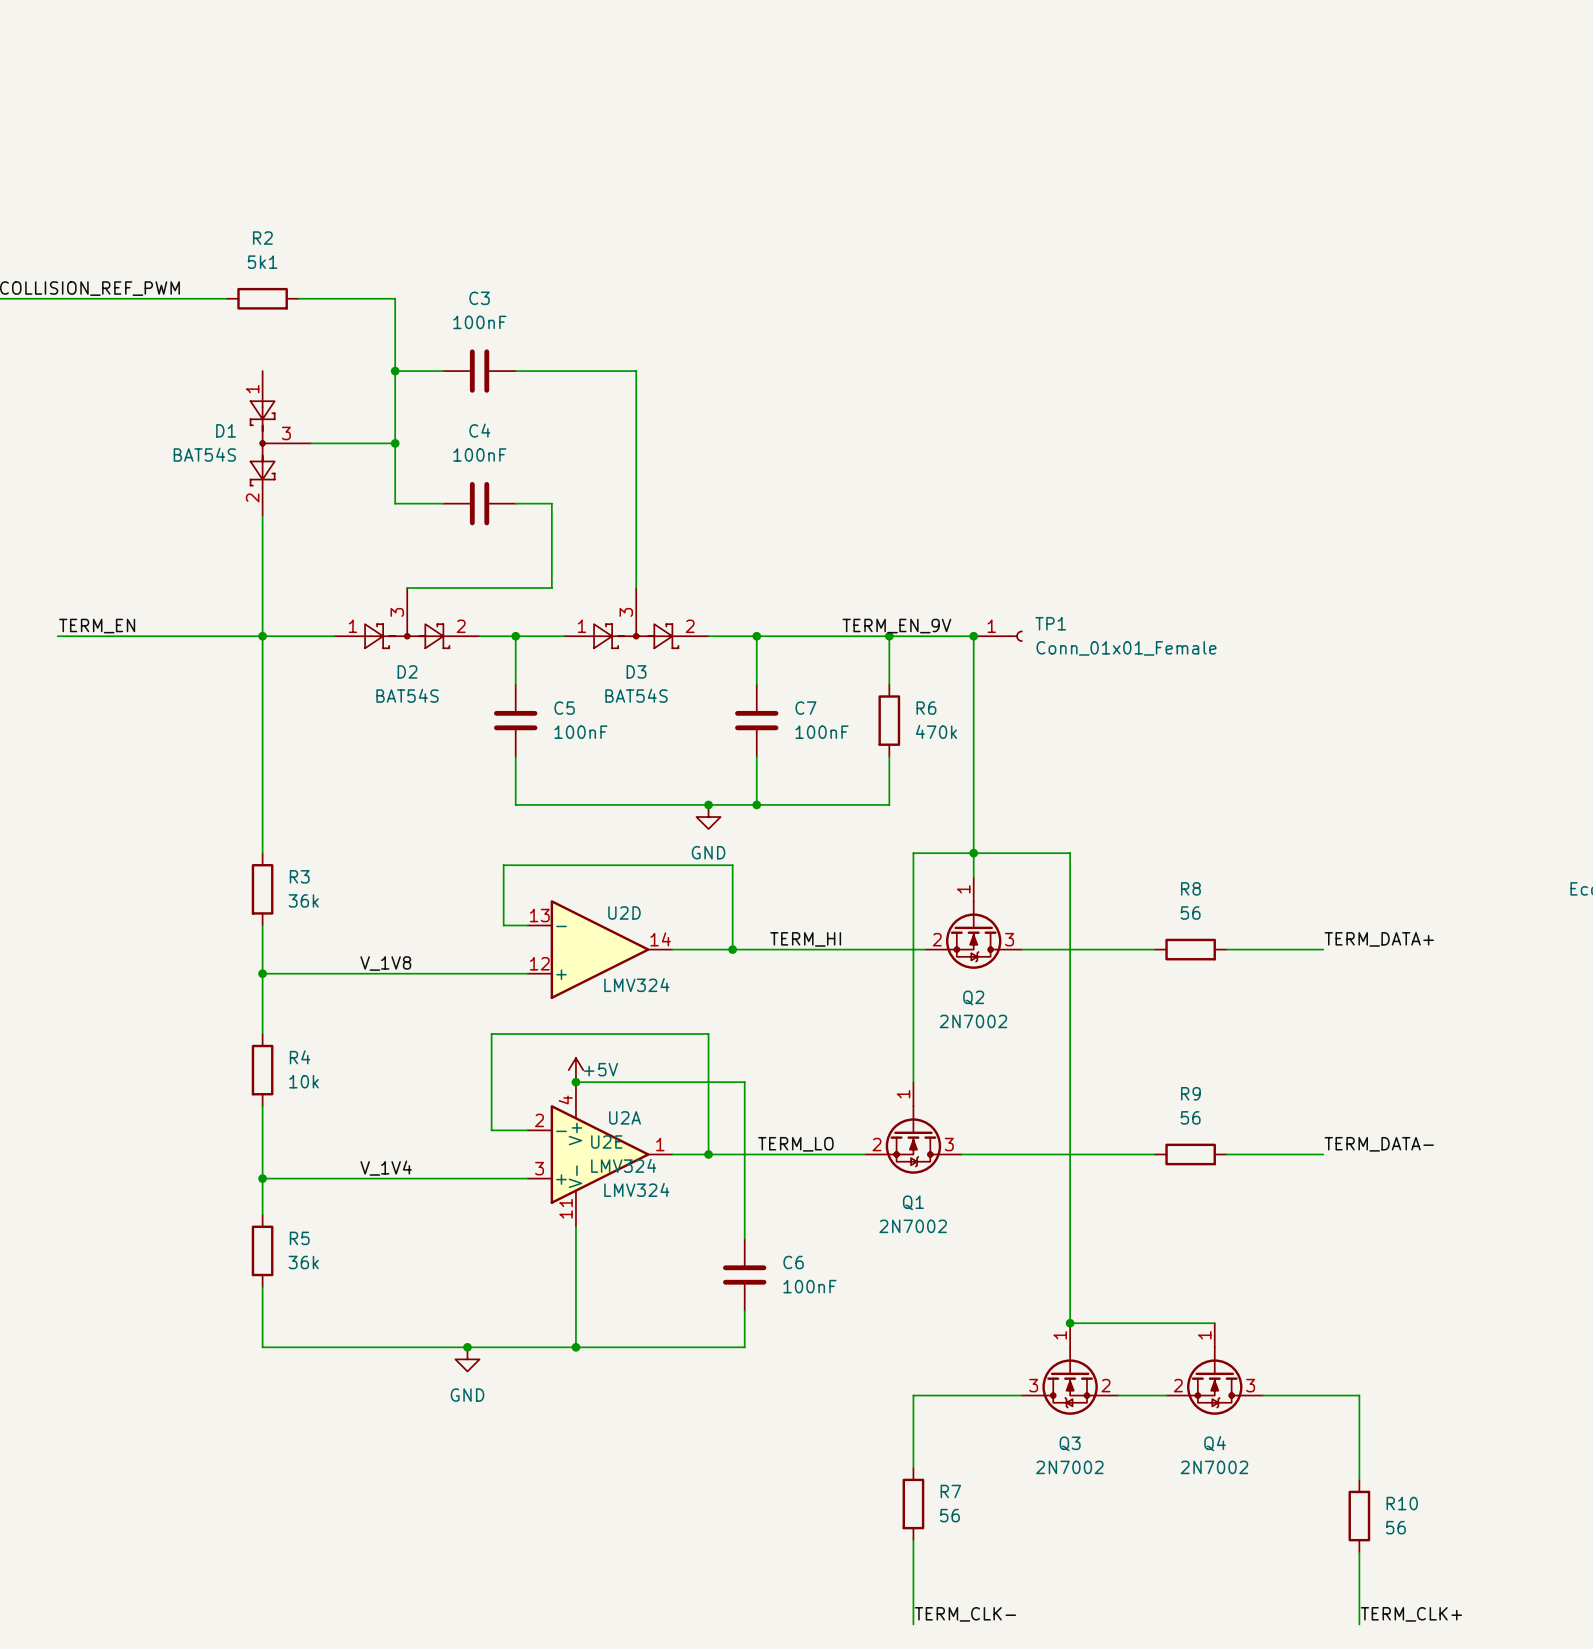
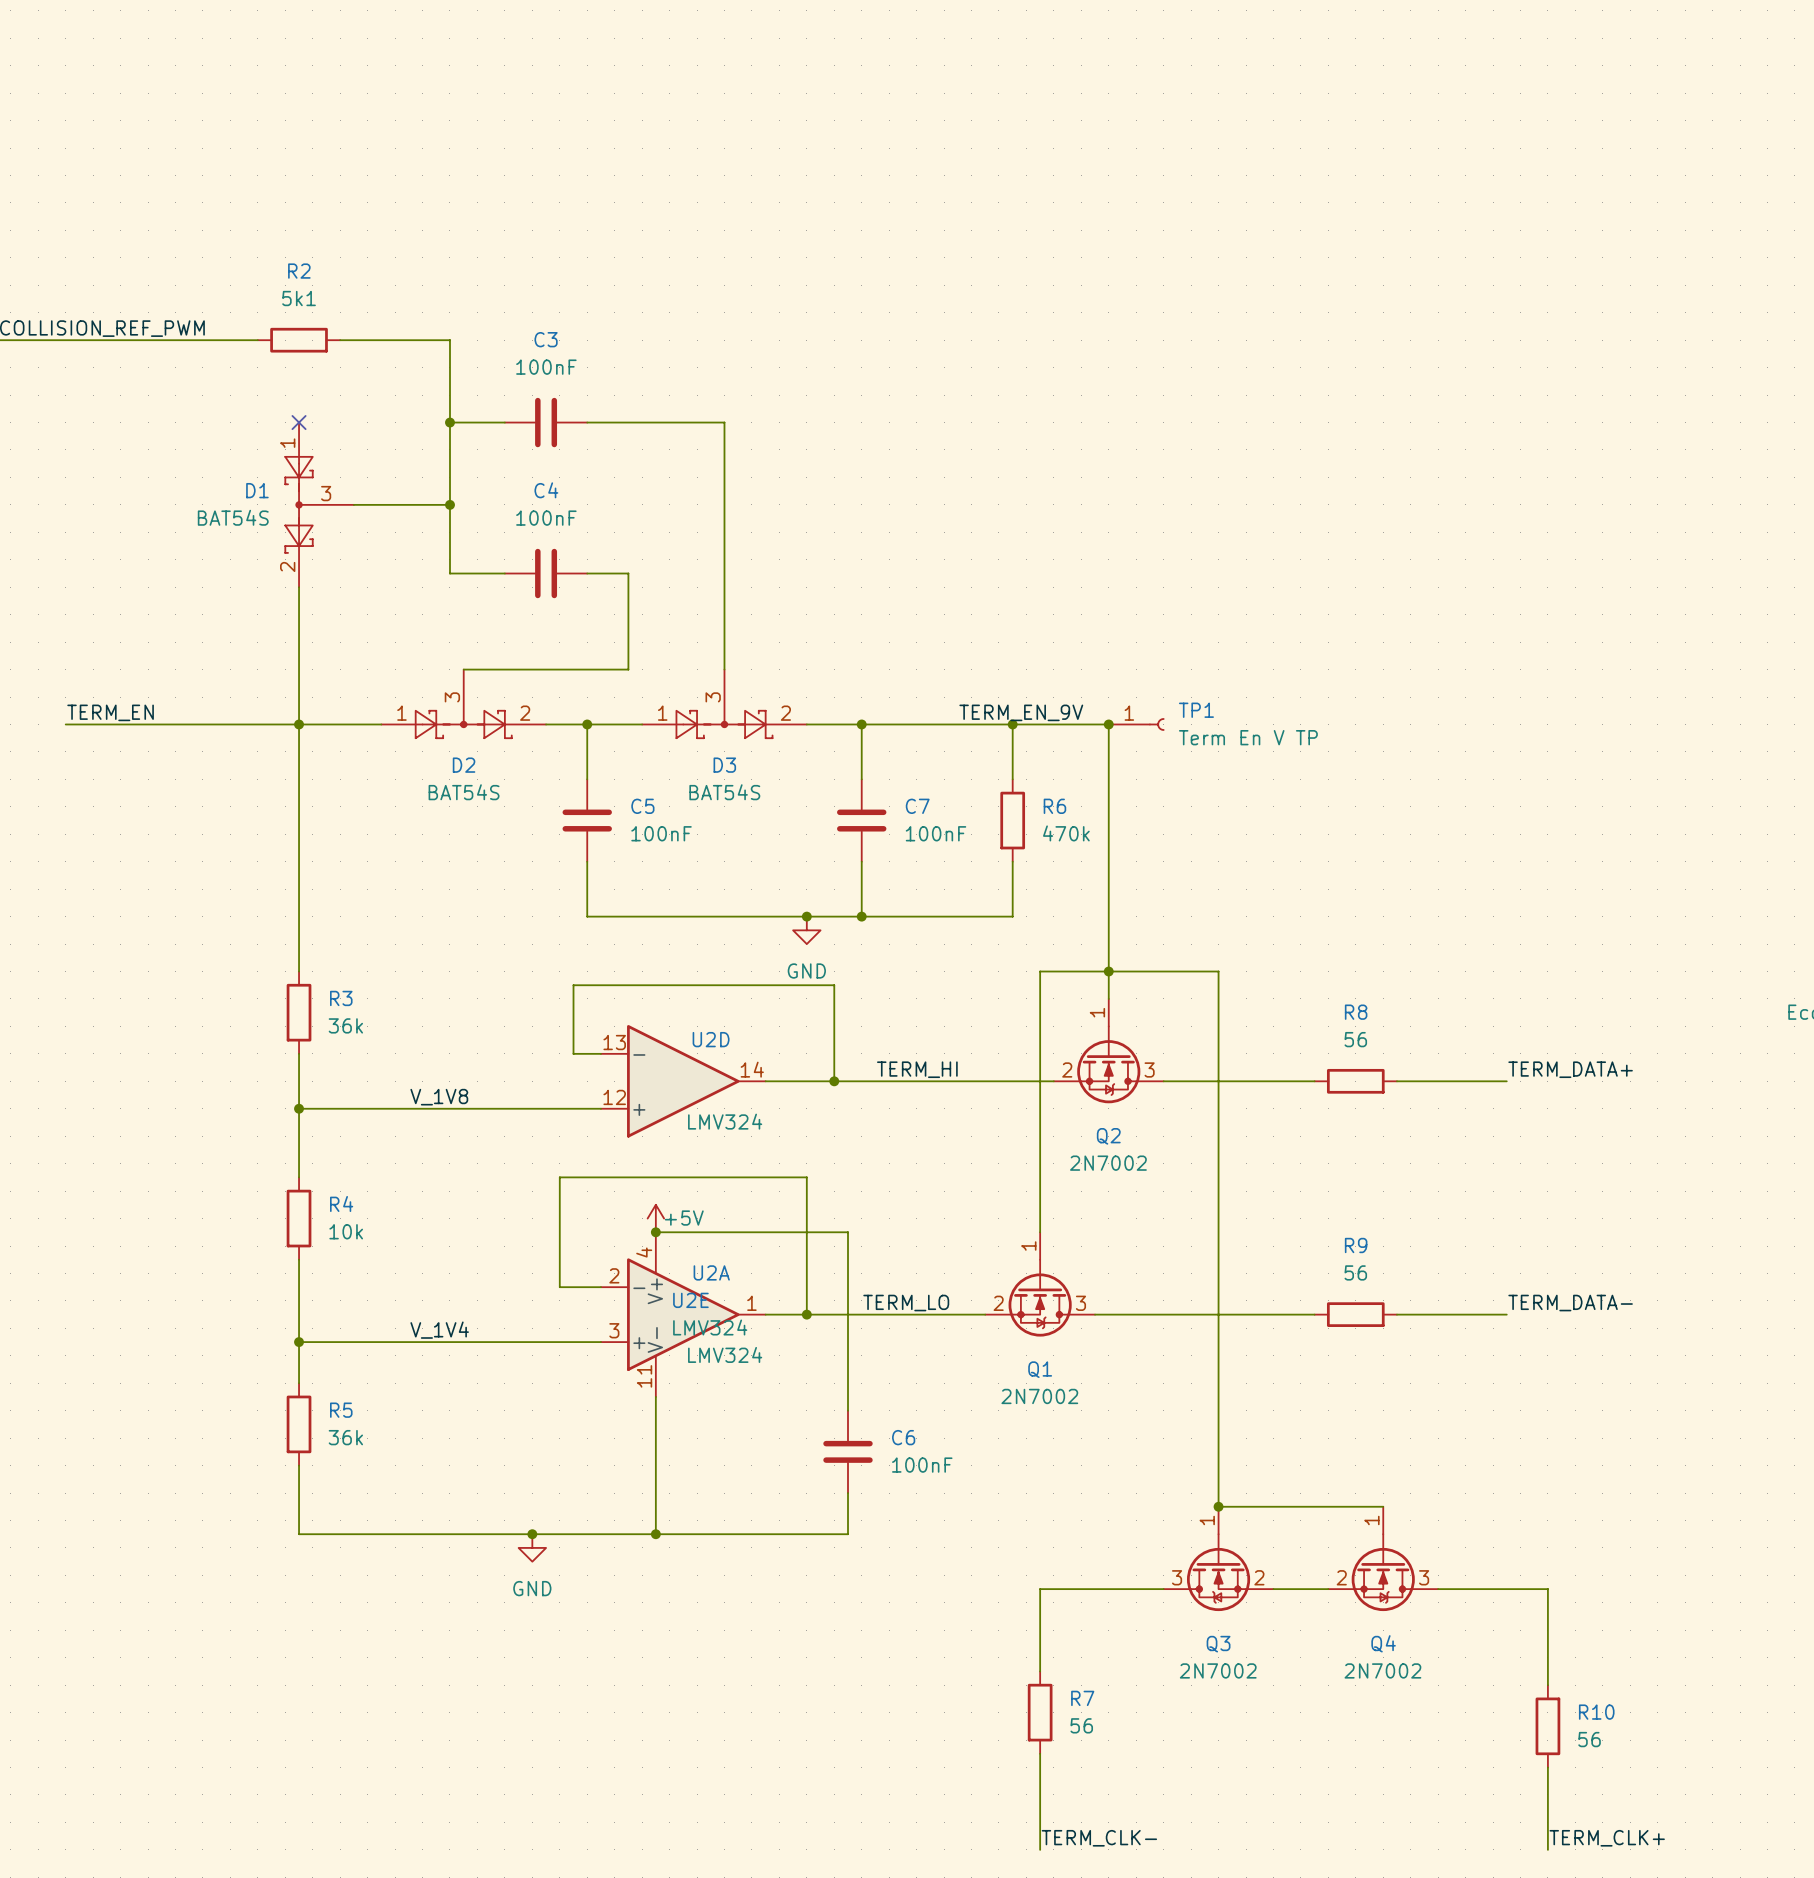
no-connect mark: none -> (299, 422)
TP1 value: Conn_01x01_Female (1126, 648) -> Term En V TP (1248, 737)

